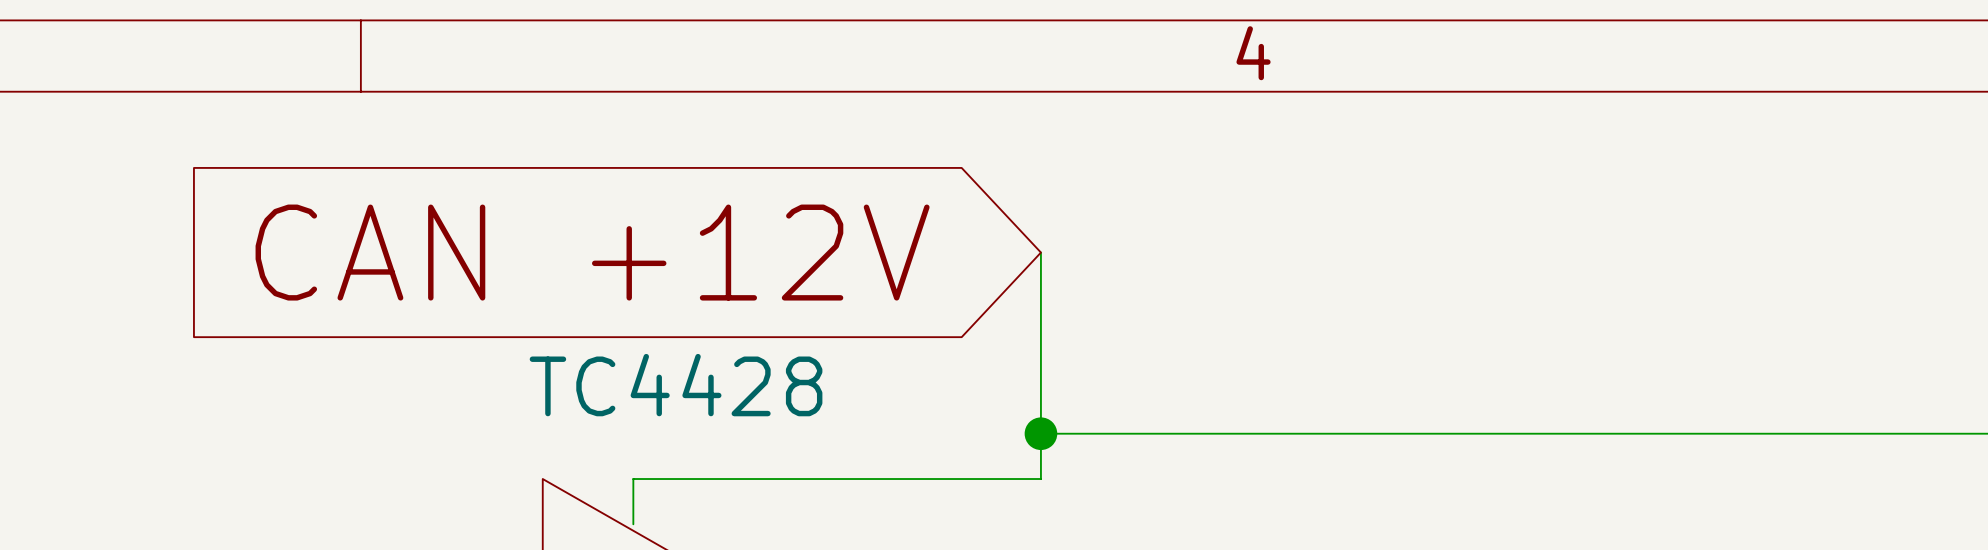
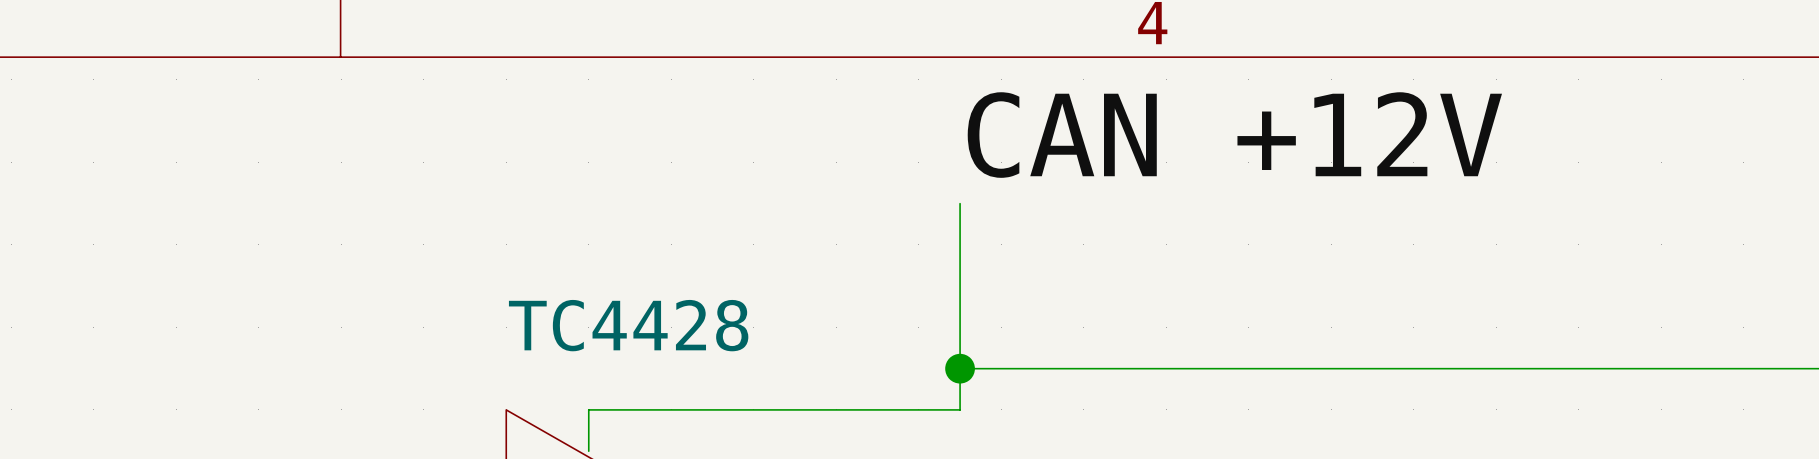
label: none -> CAN +12V (1234, 135)
global label: CAN +12V (592, 252) -> none

